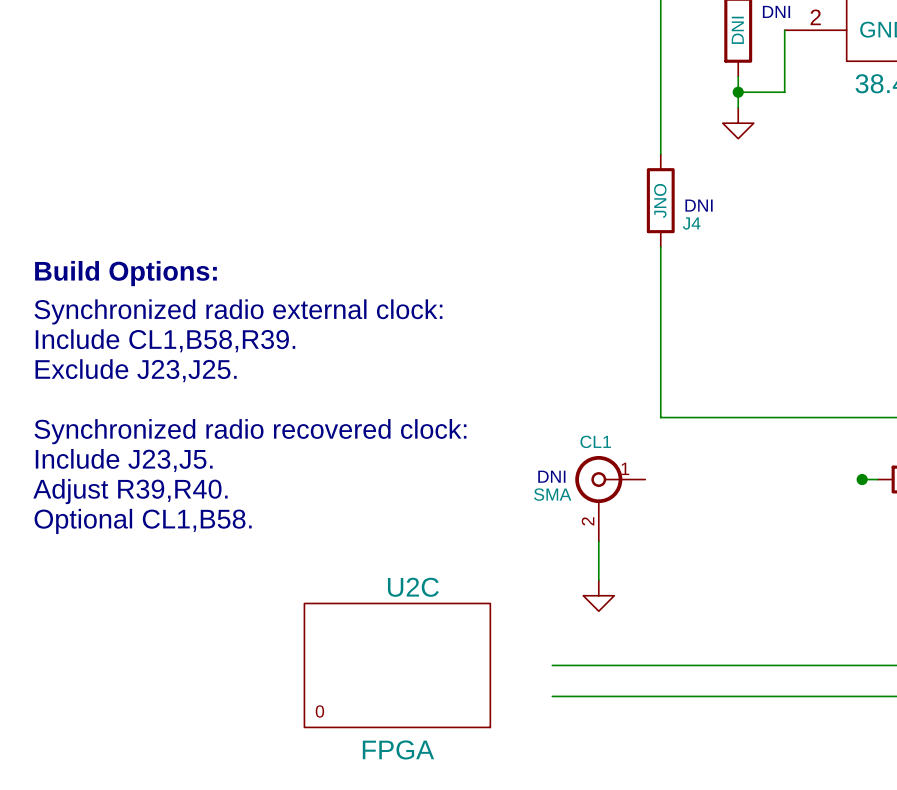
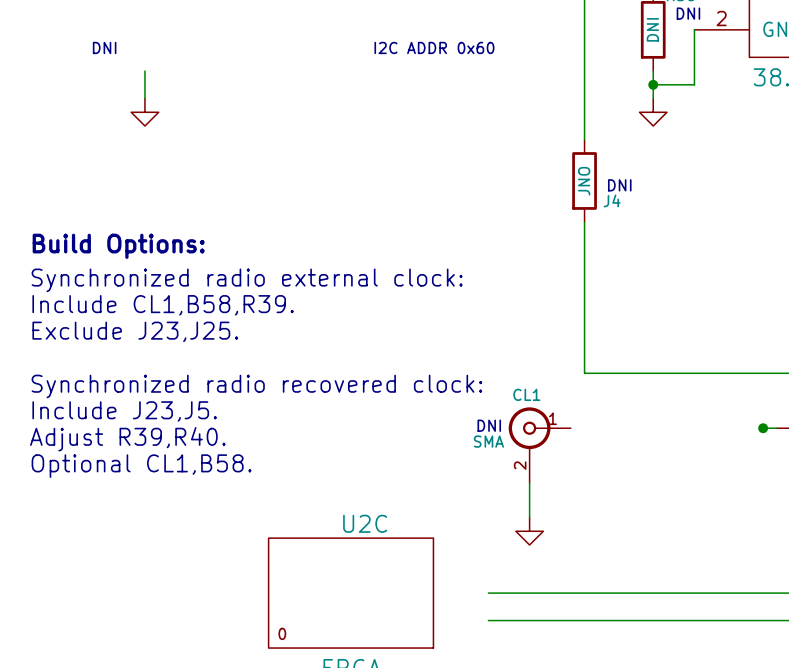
text: none -> DNI (104, 47)
text: none -> I2C ADDR 0x60 (434, 47)
wire: none -> (144, 71) (144, 98)
power symbol: none -> (144, 112)

